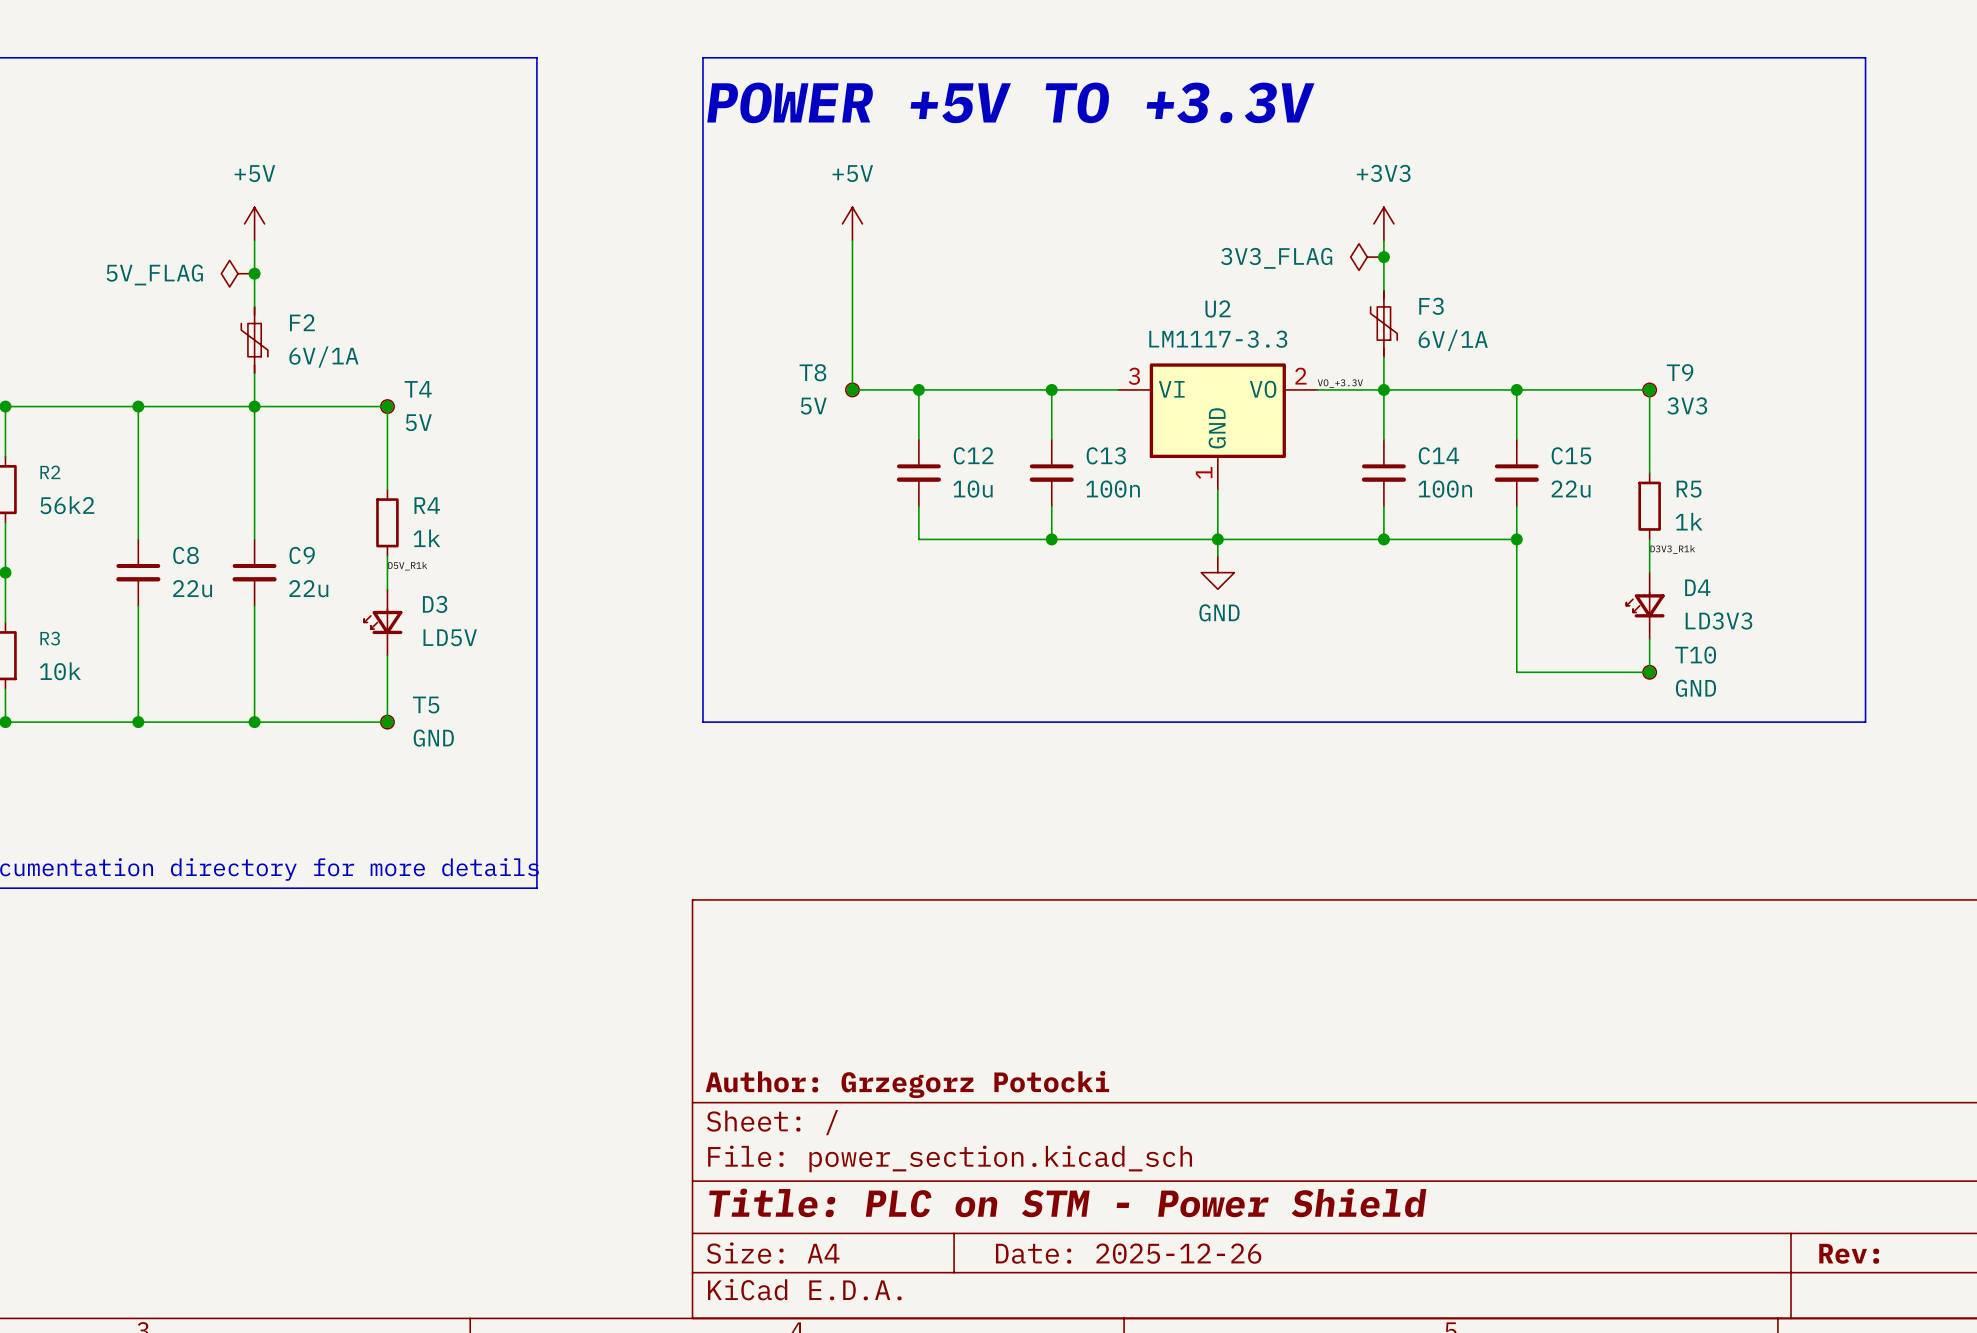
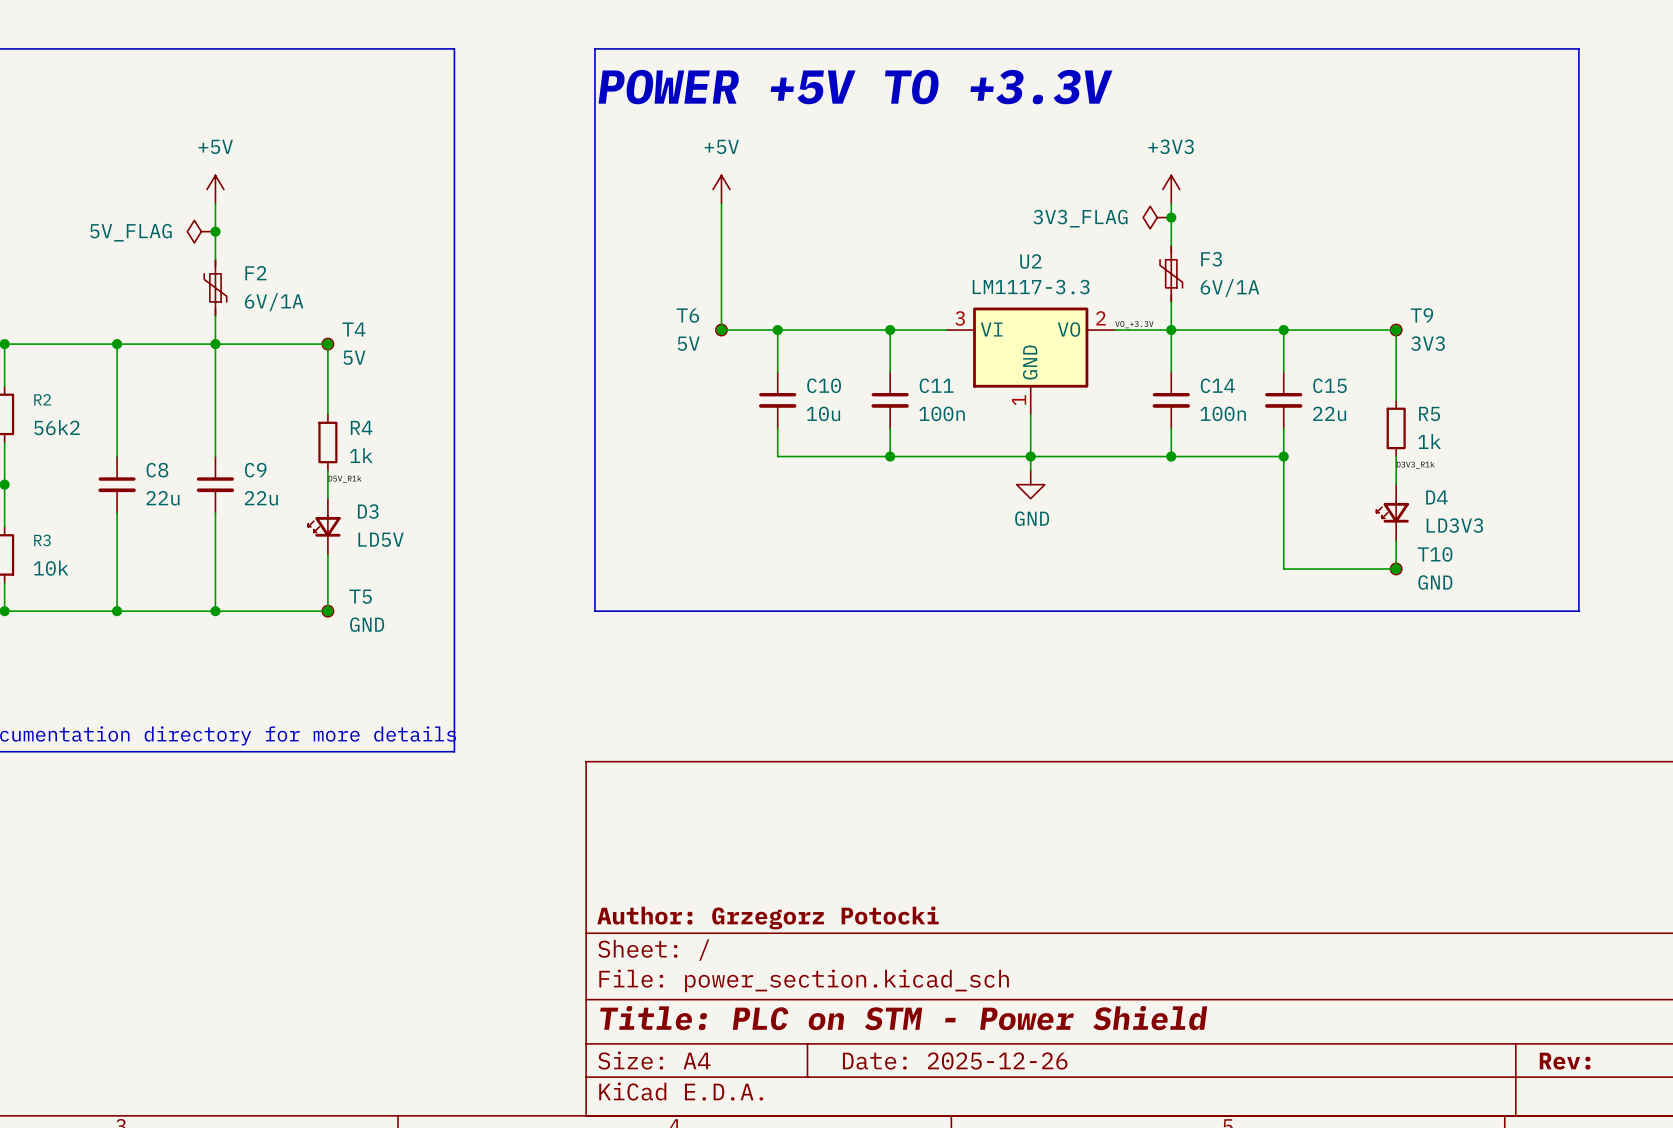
T8 name: T8 (812, 372) -> T6 (687, 315)
C12 name: C12 (973, 455) -> C10 (824, 385)
C13 name: C13 (1106, 455) -> C11 (936, 385)

